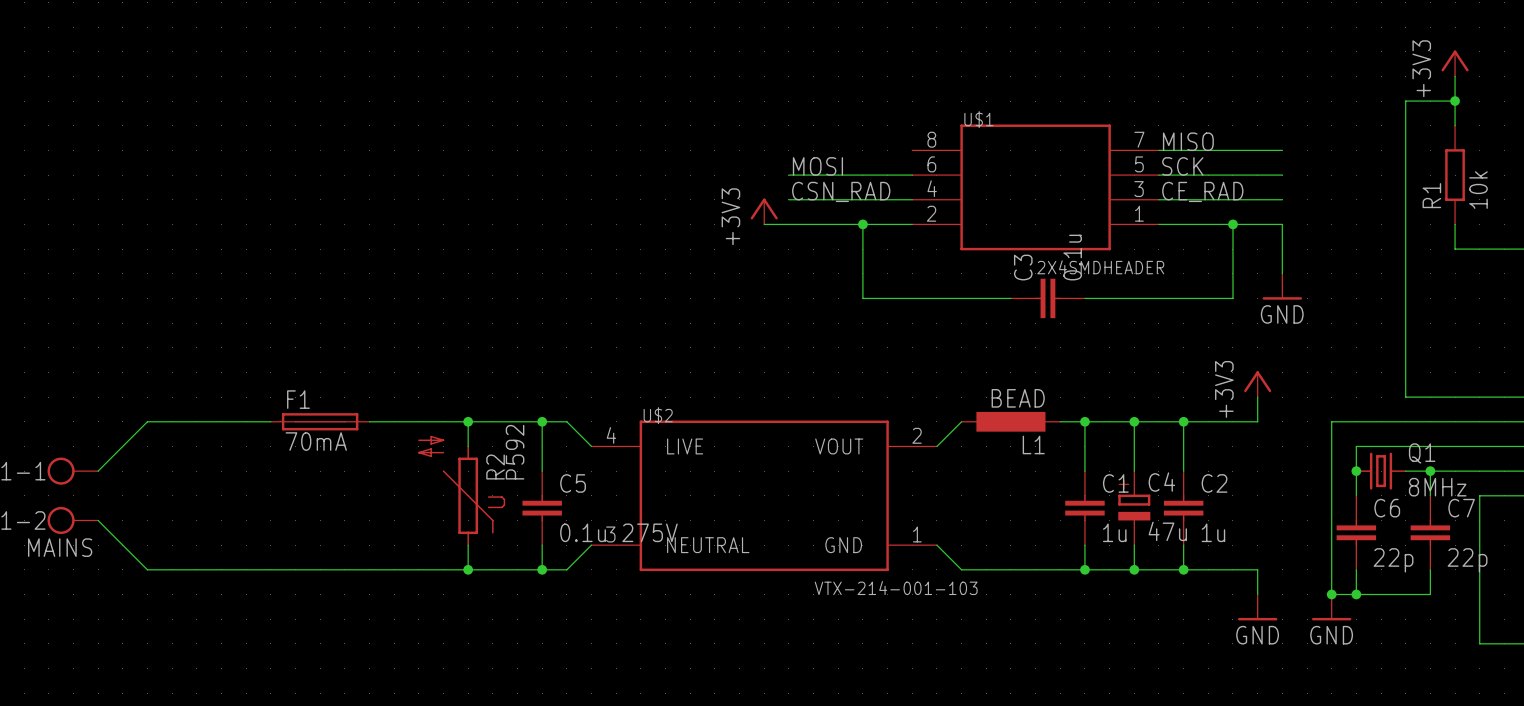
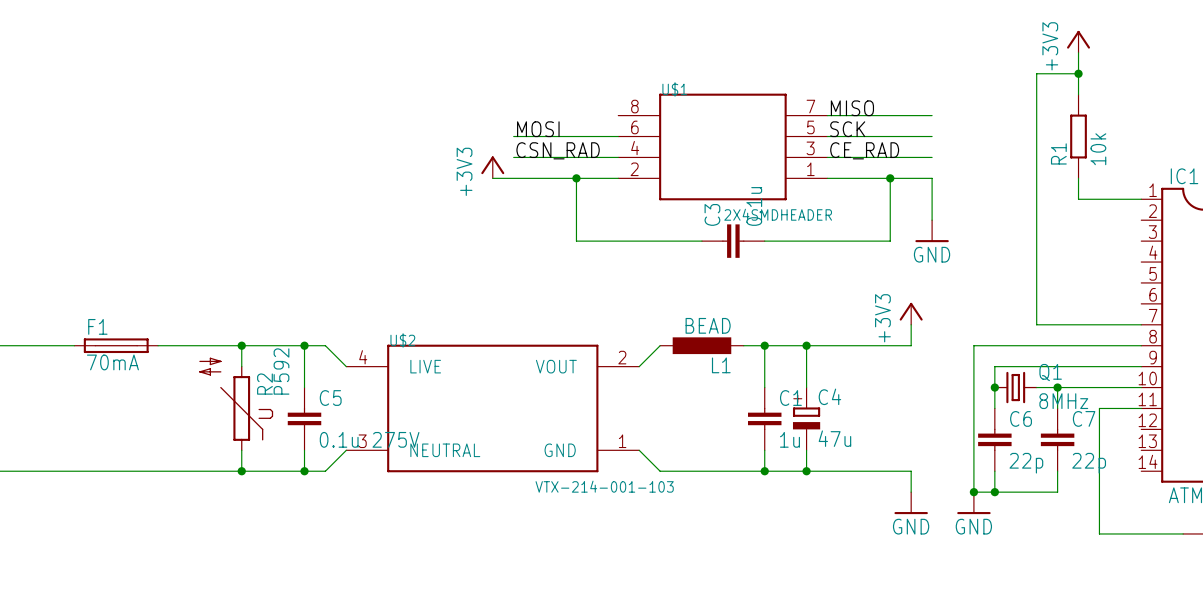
wire: (1183, 421) (1183, 471) -> none
junction: (1183, 421) -> none
C2: 1u (1183, 508) -> none
wire: (1183, 545) (1183, 569) -> none
junction: (1183, 569) -> none

